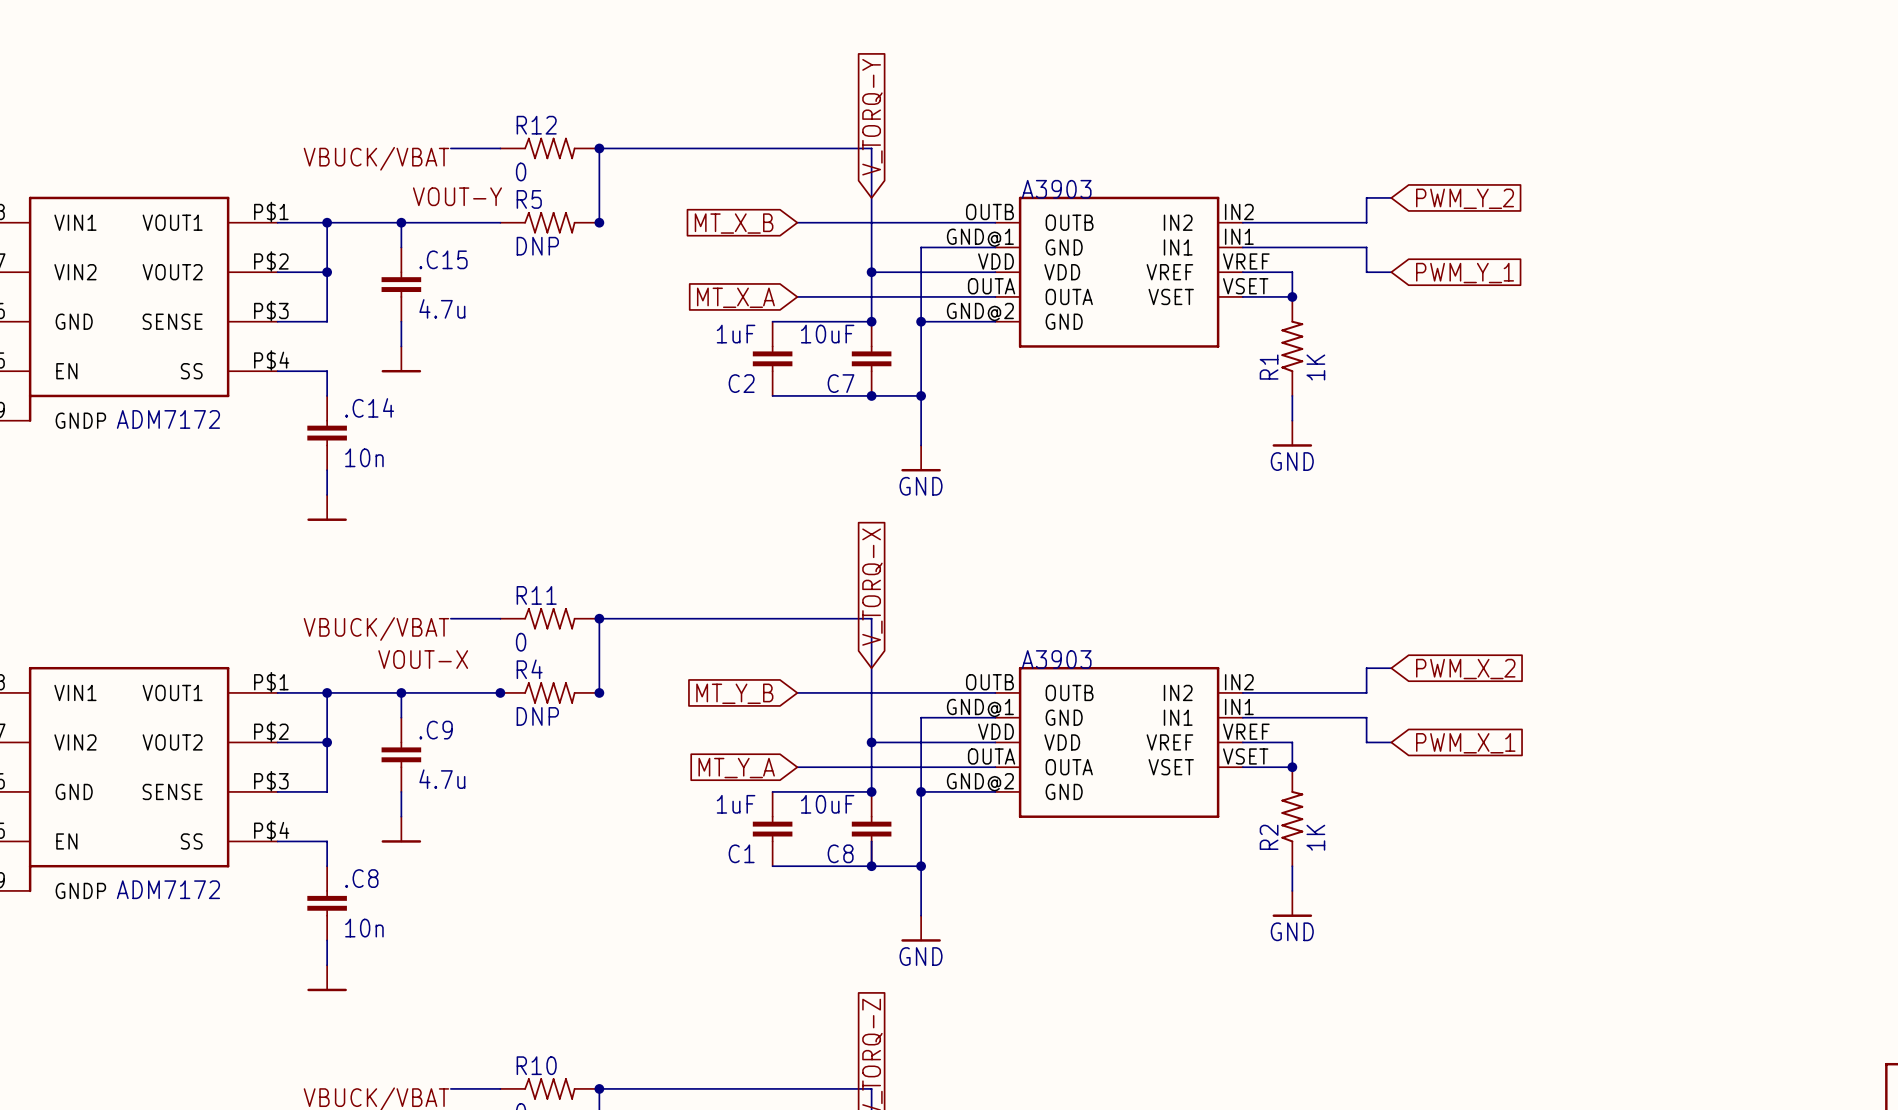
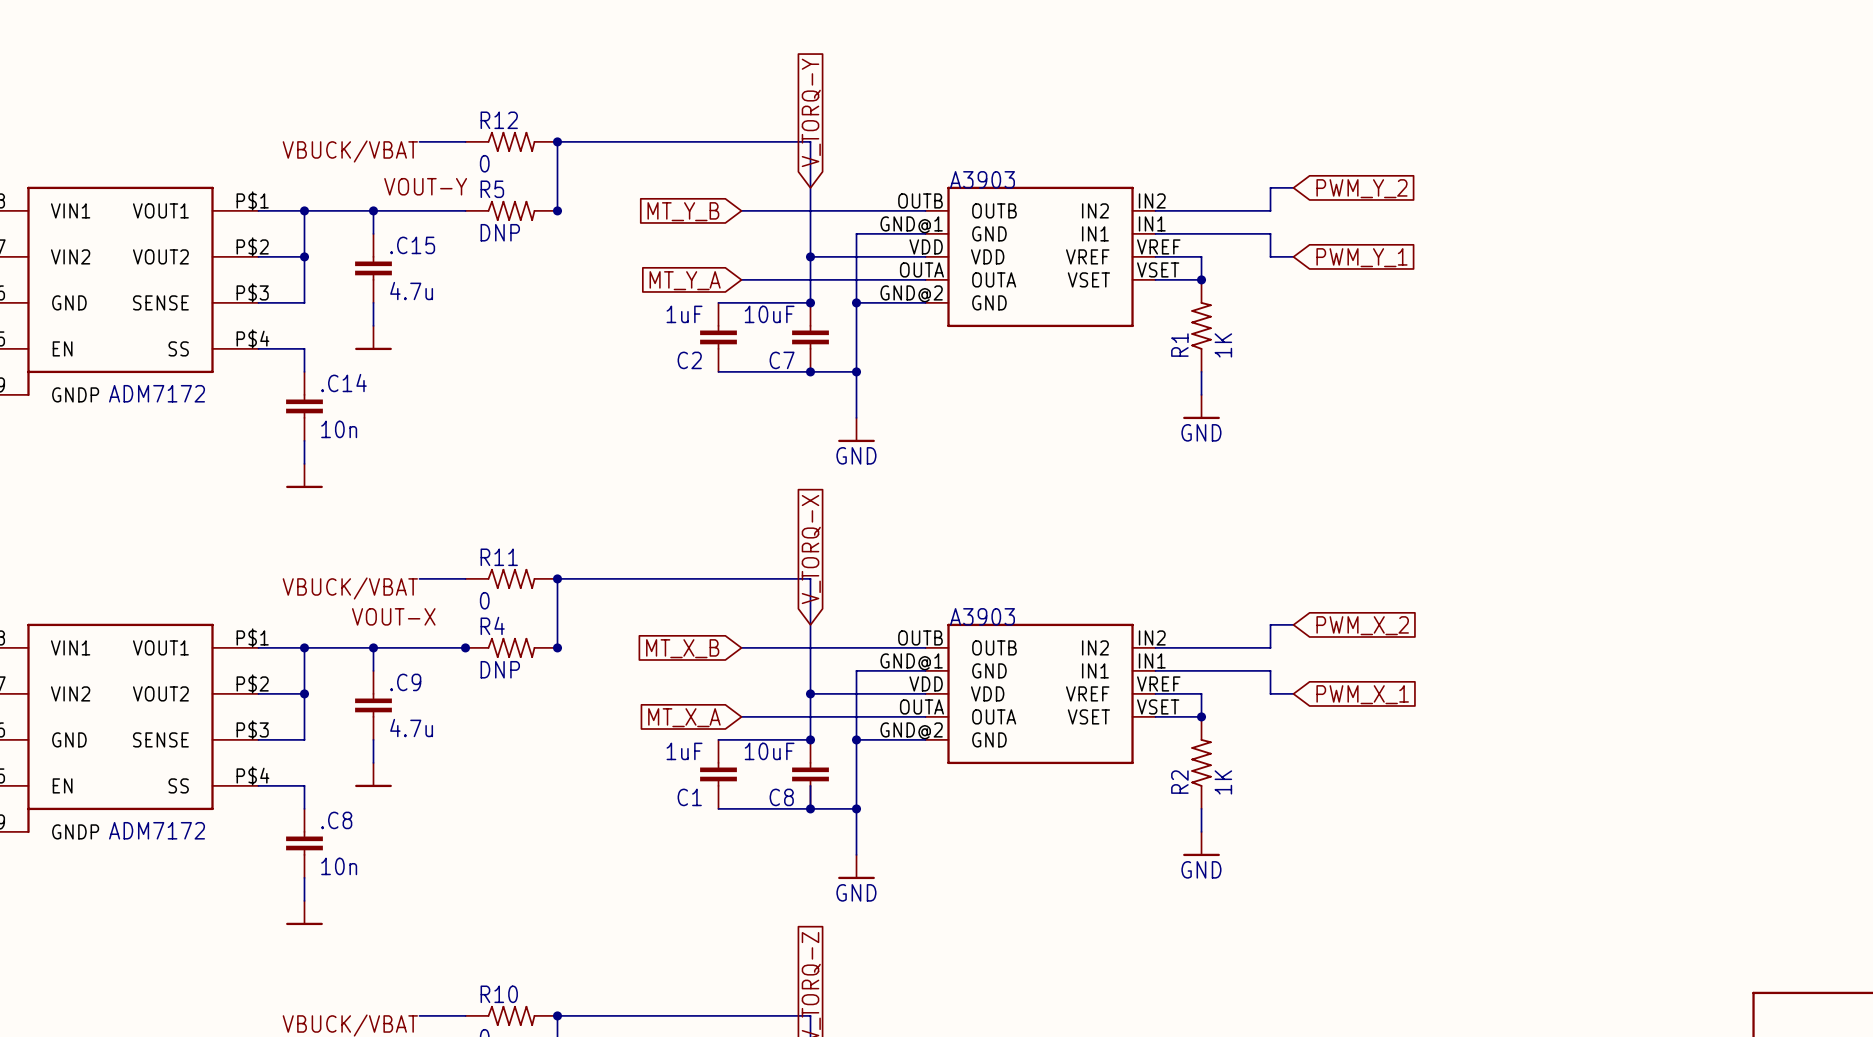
global label: MT_X_B (734, 223) -> MT_Y_B (683, 211)
global label: MT_X_A (735, 297) -> MT_Y_A (685, 280)
global label: MT_Y_B (734, 693) -> MT_X_B (682, 648)
global label: MT_Y_A (736, 768) -> MT_X_A (684, 717)

